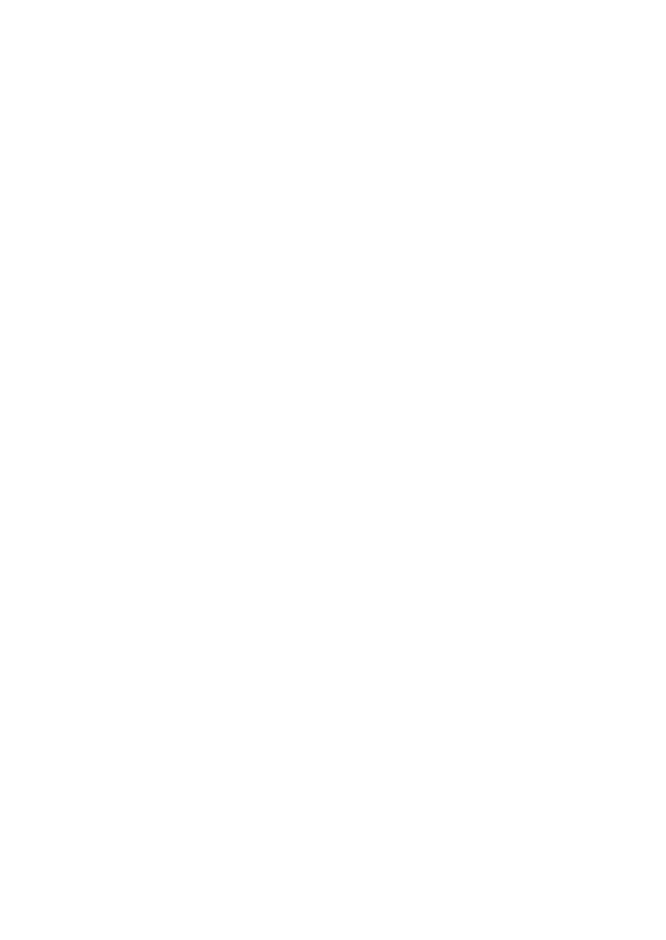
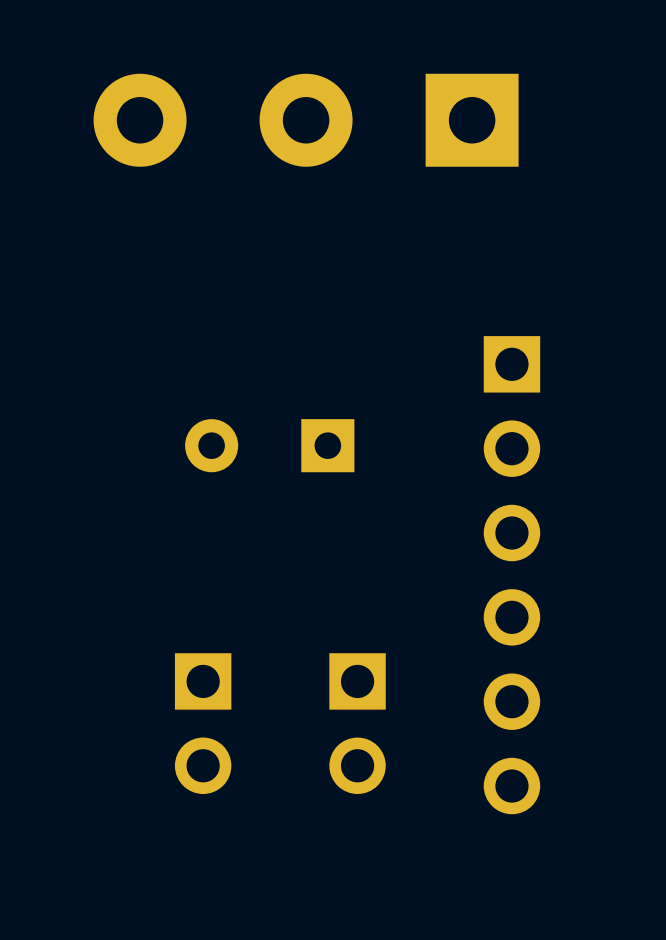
part: none -> (306, 120)
part: none -> (269, 445)
part: none -> (511, 575)
part: none -> (203, 723)
part: none -> (357, 723)

